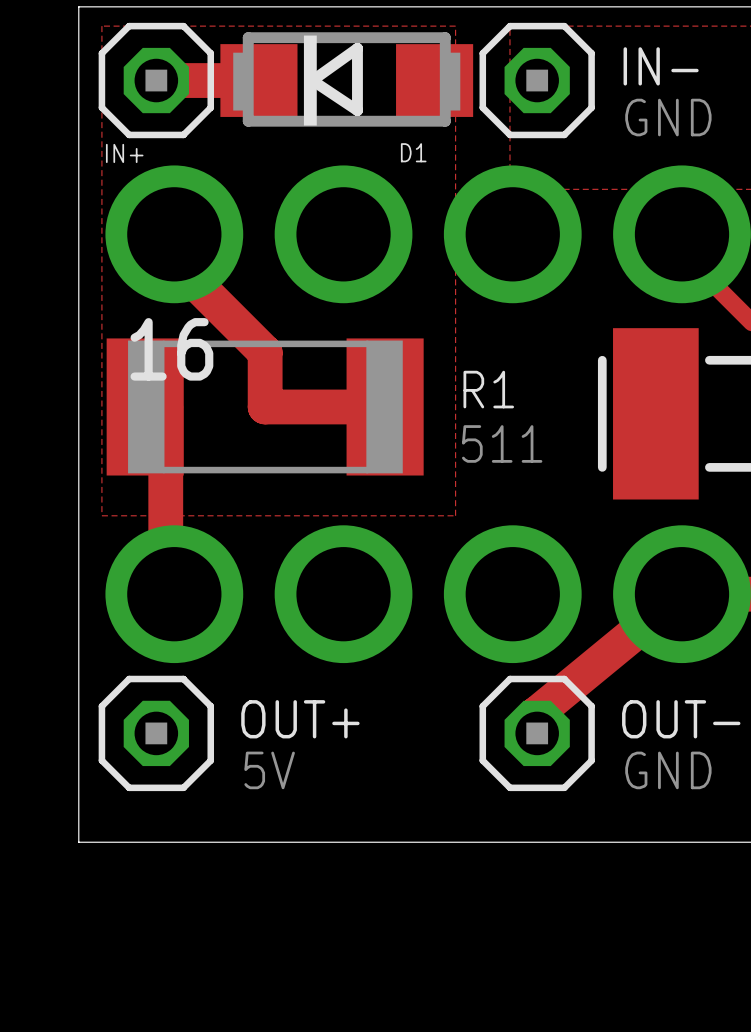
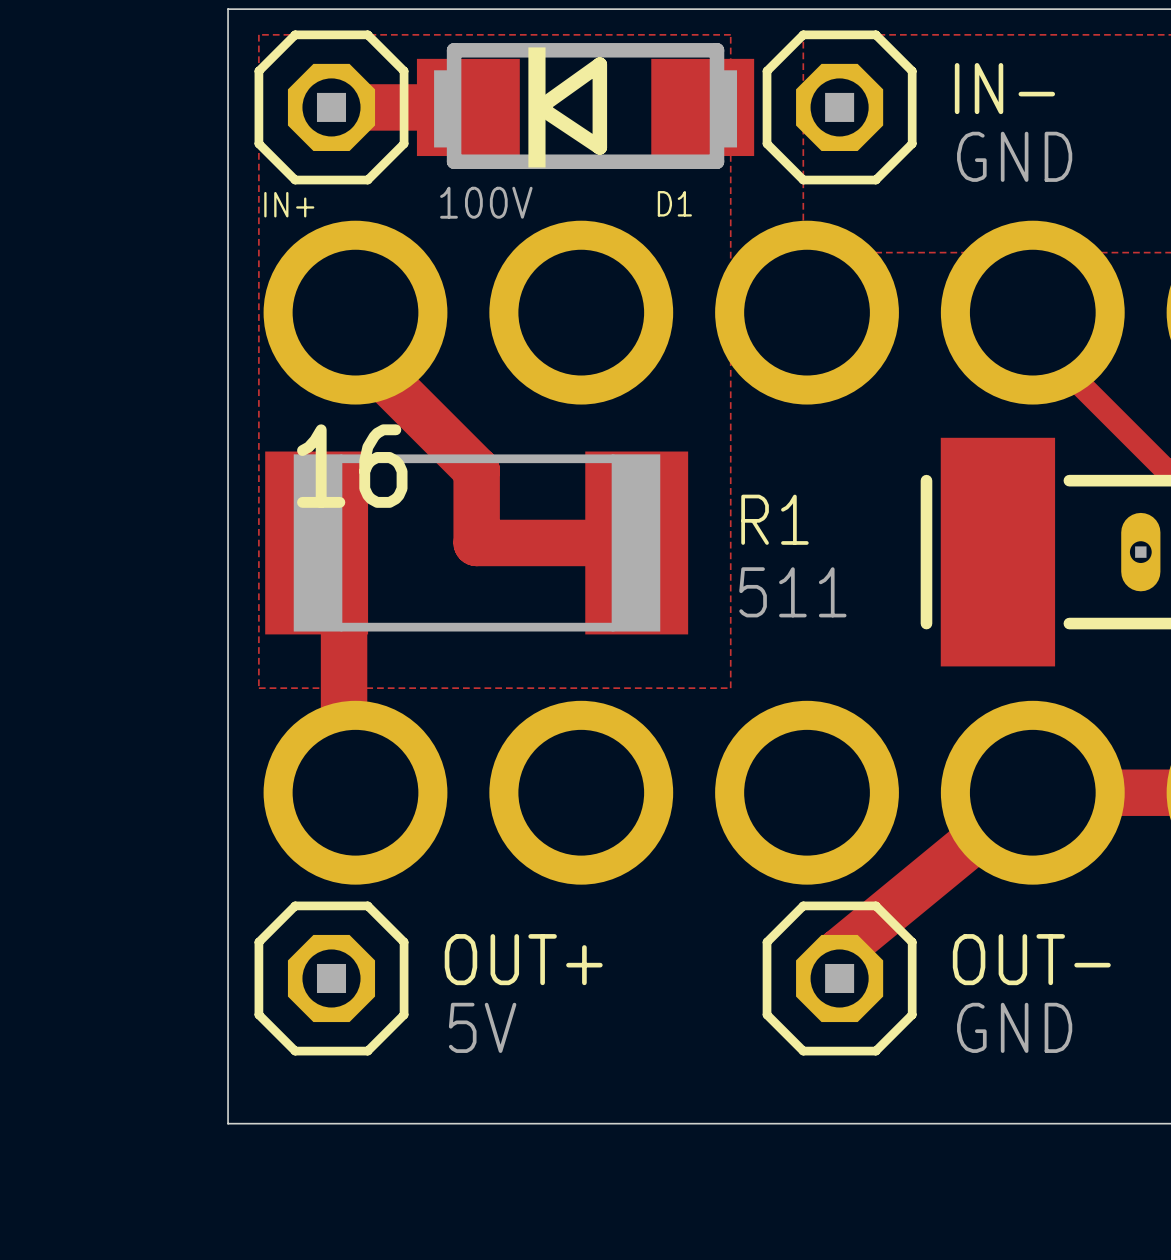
D1 value: none -> 100V (486, 202)

